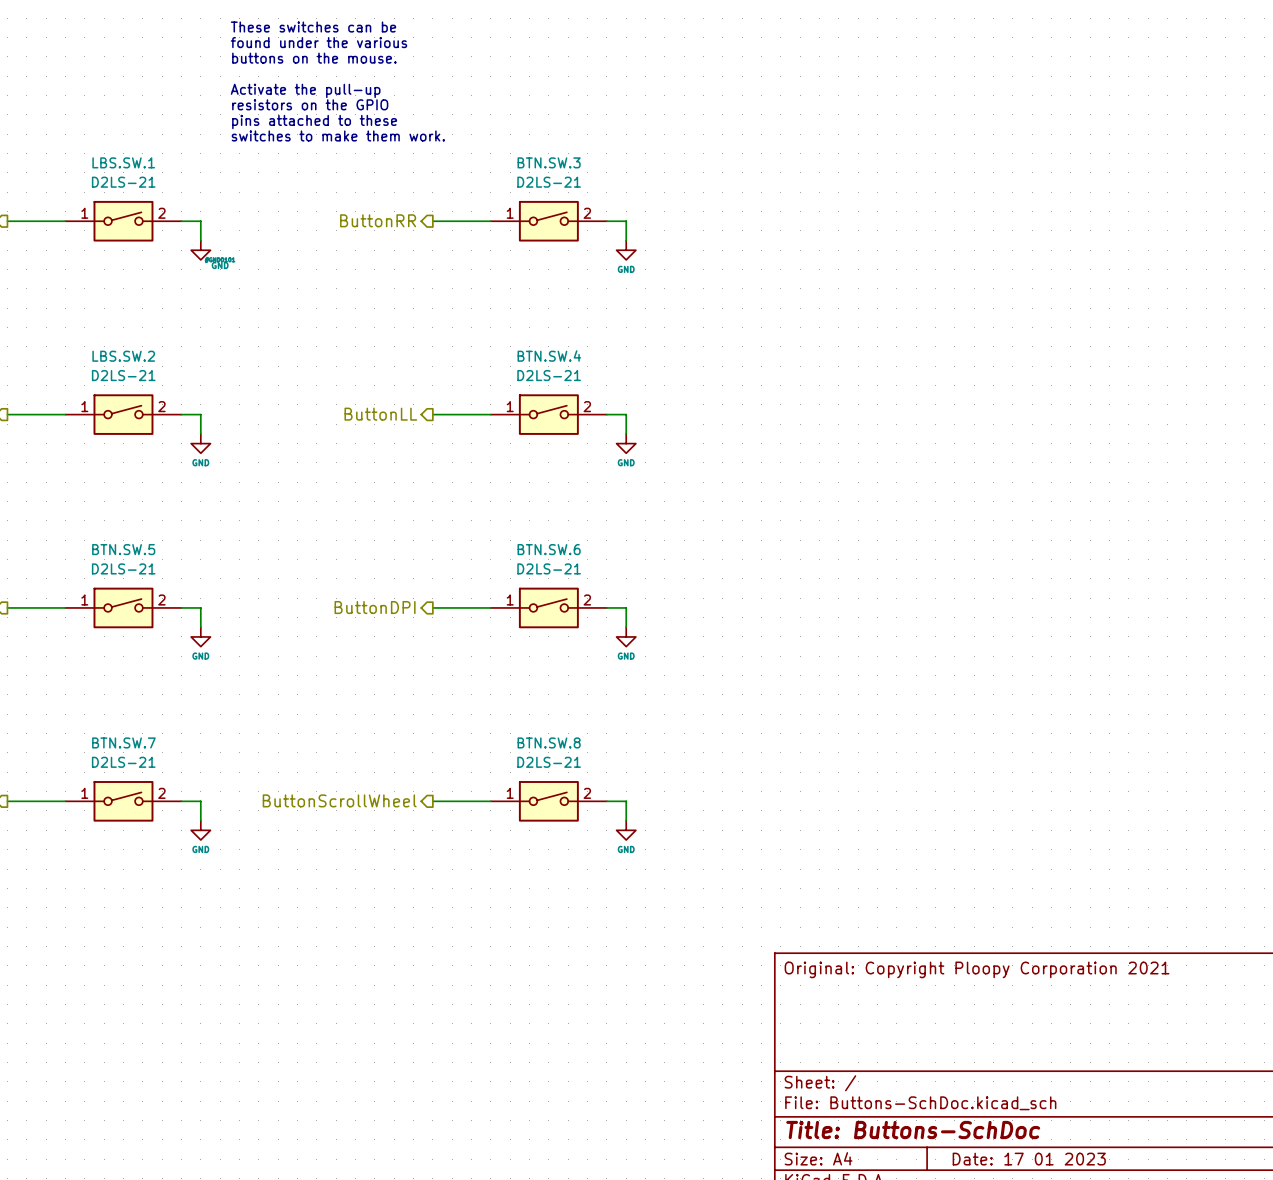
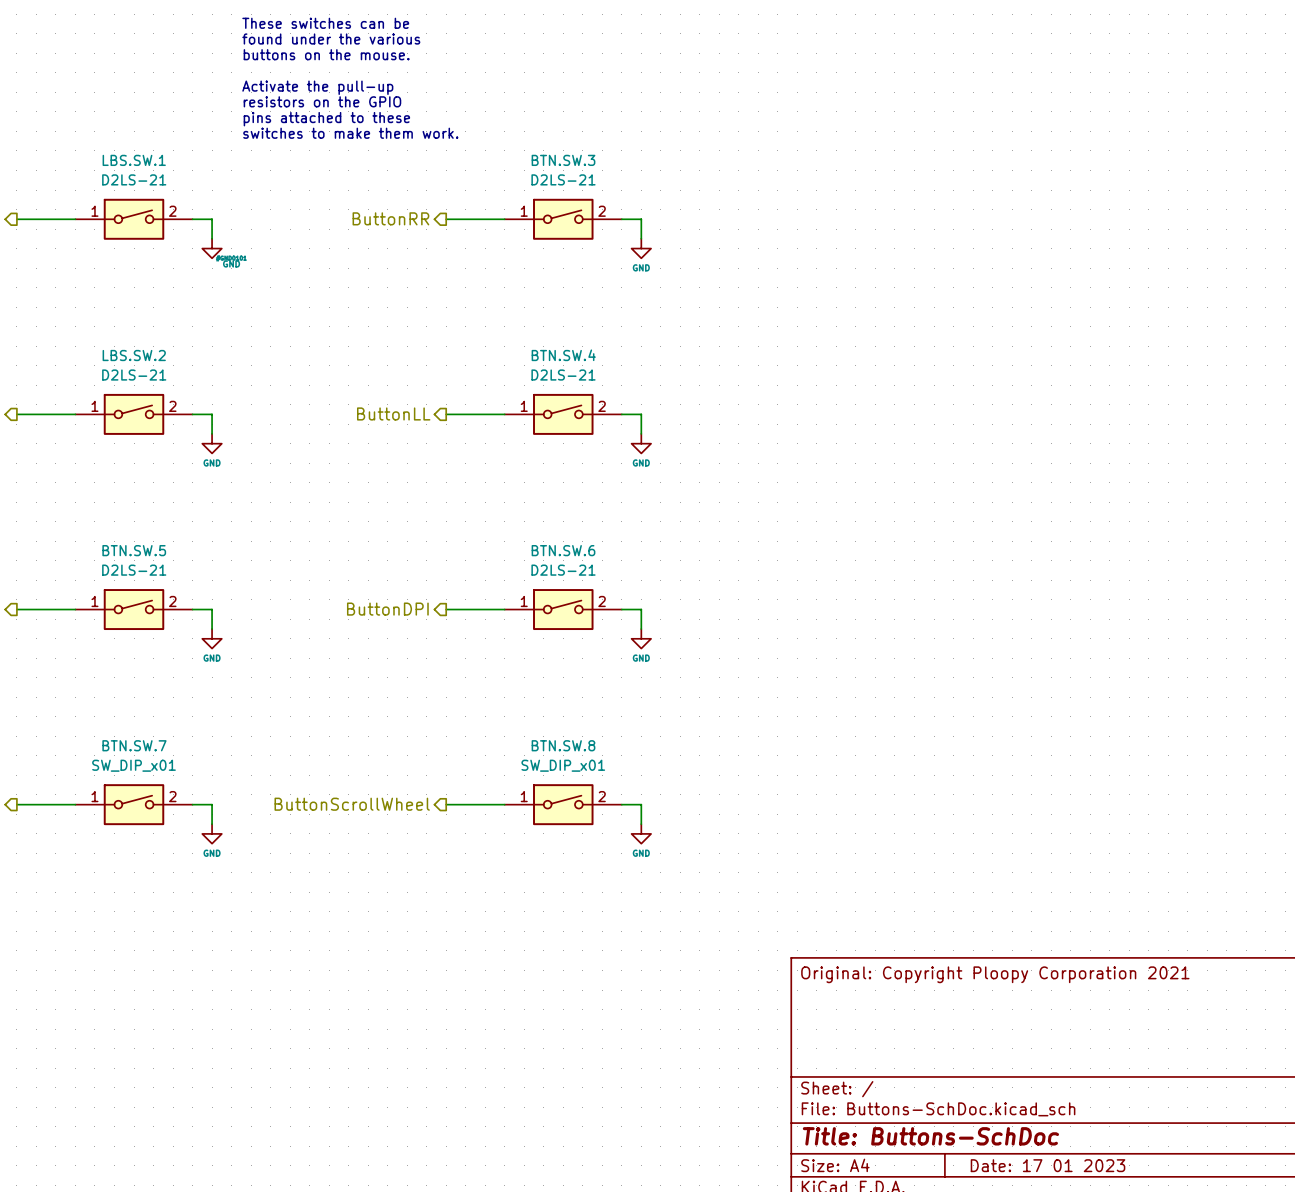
BTN.SW.7 value: D2LS-21 (123, 762) -> SW_DIP_x01 (134, 765)
BTN.SW.8 value: D2LS-21 (549, 762) -> SW_DIP_x01 (563, 765)

